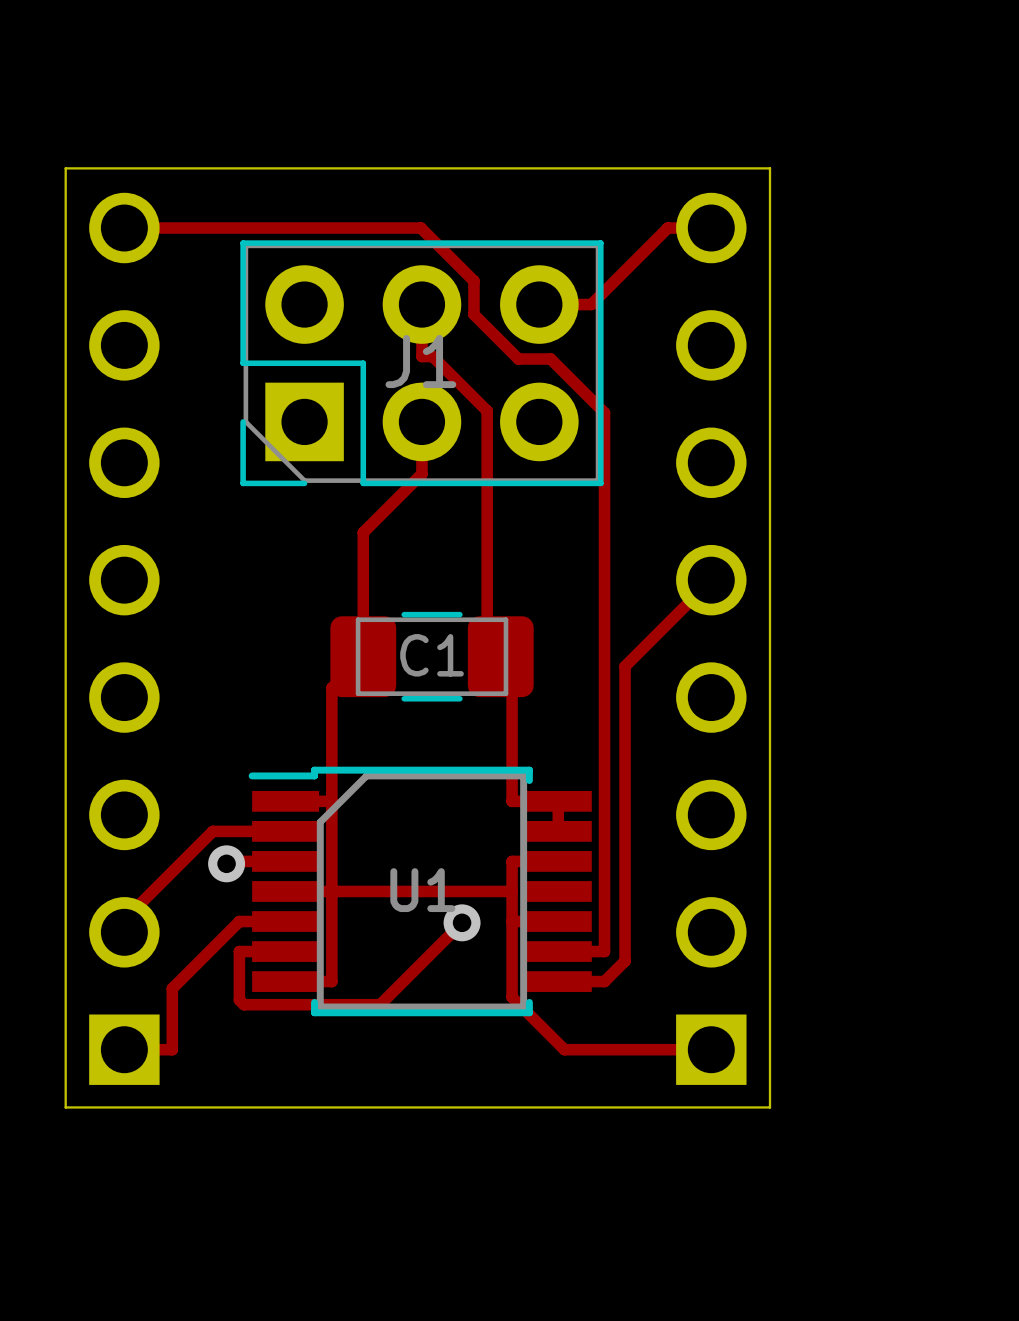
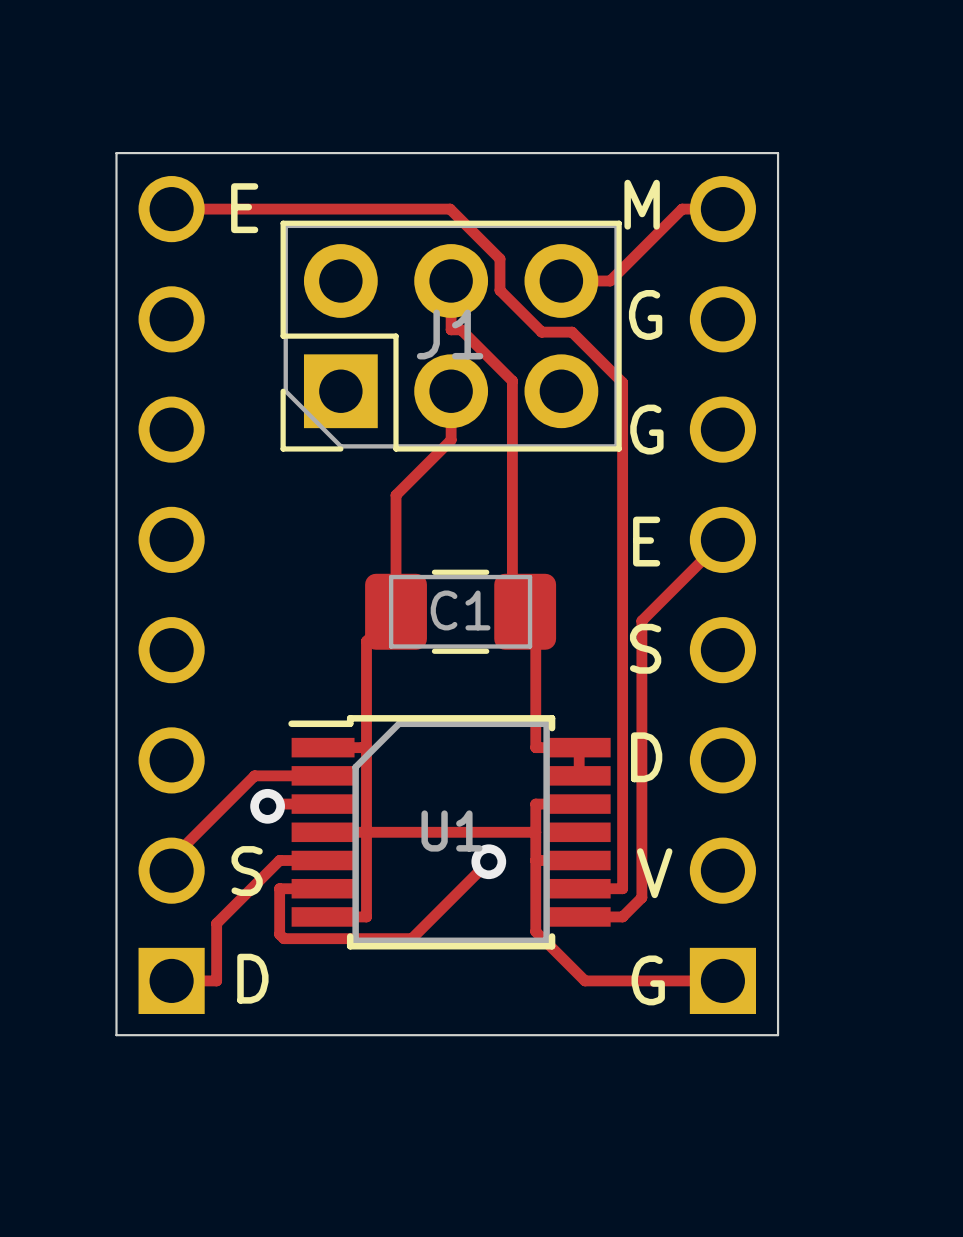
text: none -> M (642, 204)
text: none -> E (244, 208)
text: none -> G (645, 314)
text: none -> G (646, 429)
text: none -> E (646, 541)
text: none -> S (645, 648)
text: none -> D (646, 757)
text: none -> S (247, 871)
text: none -> V (654, 873)
text: none -> D (252, 978)
text: none -> G (648, 980)

